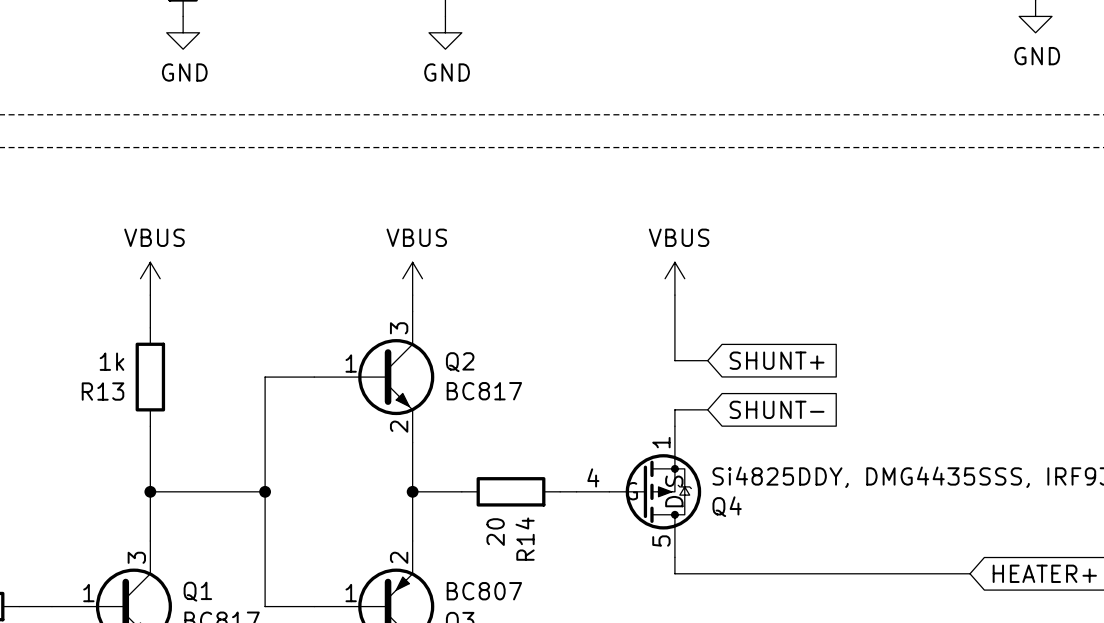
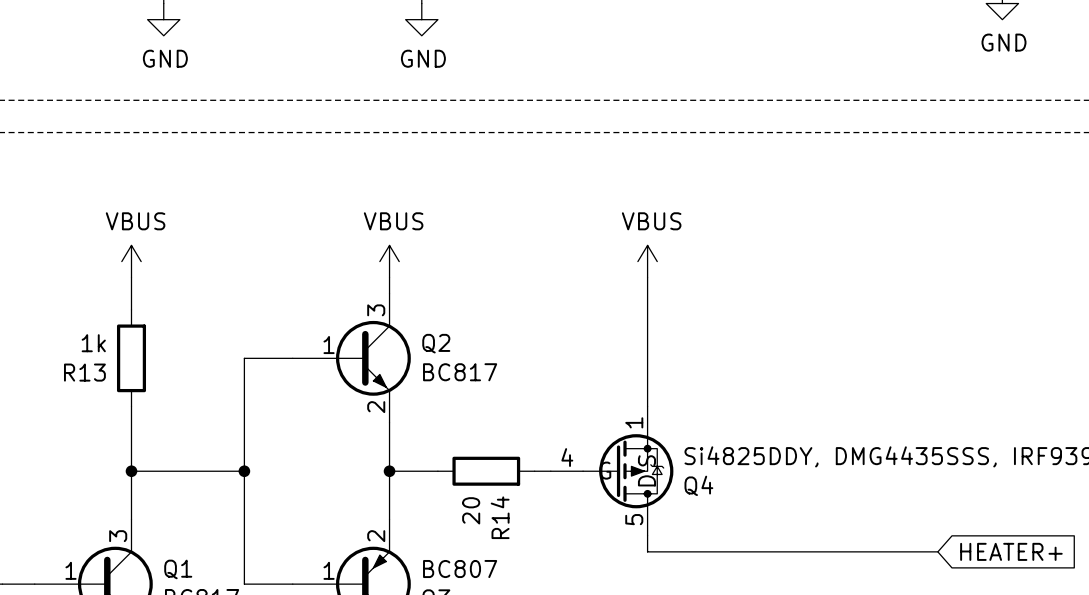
wire: (674, 360) (707, 360) -> (647, 342) (647, 390)
global label: SHUNT+ (777, 360) -> none
wire: (674, 409) (707, 409) -> none
global label: SHUNT- (777, 409) -> none

